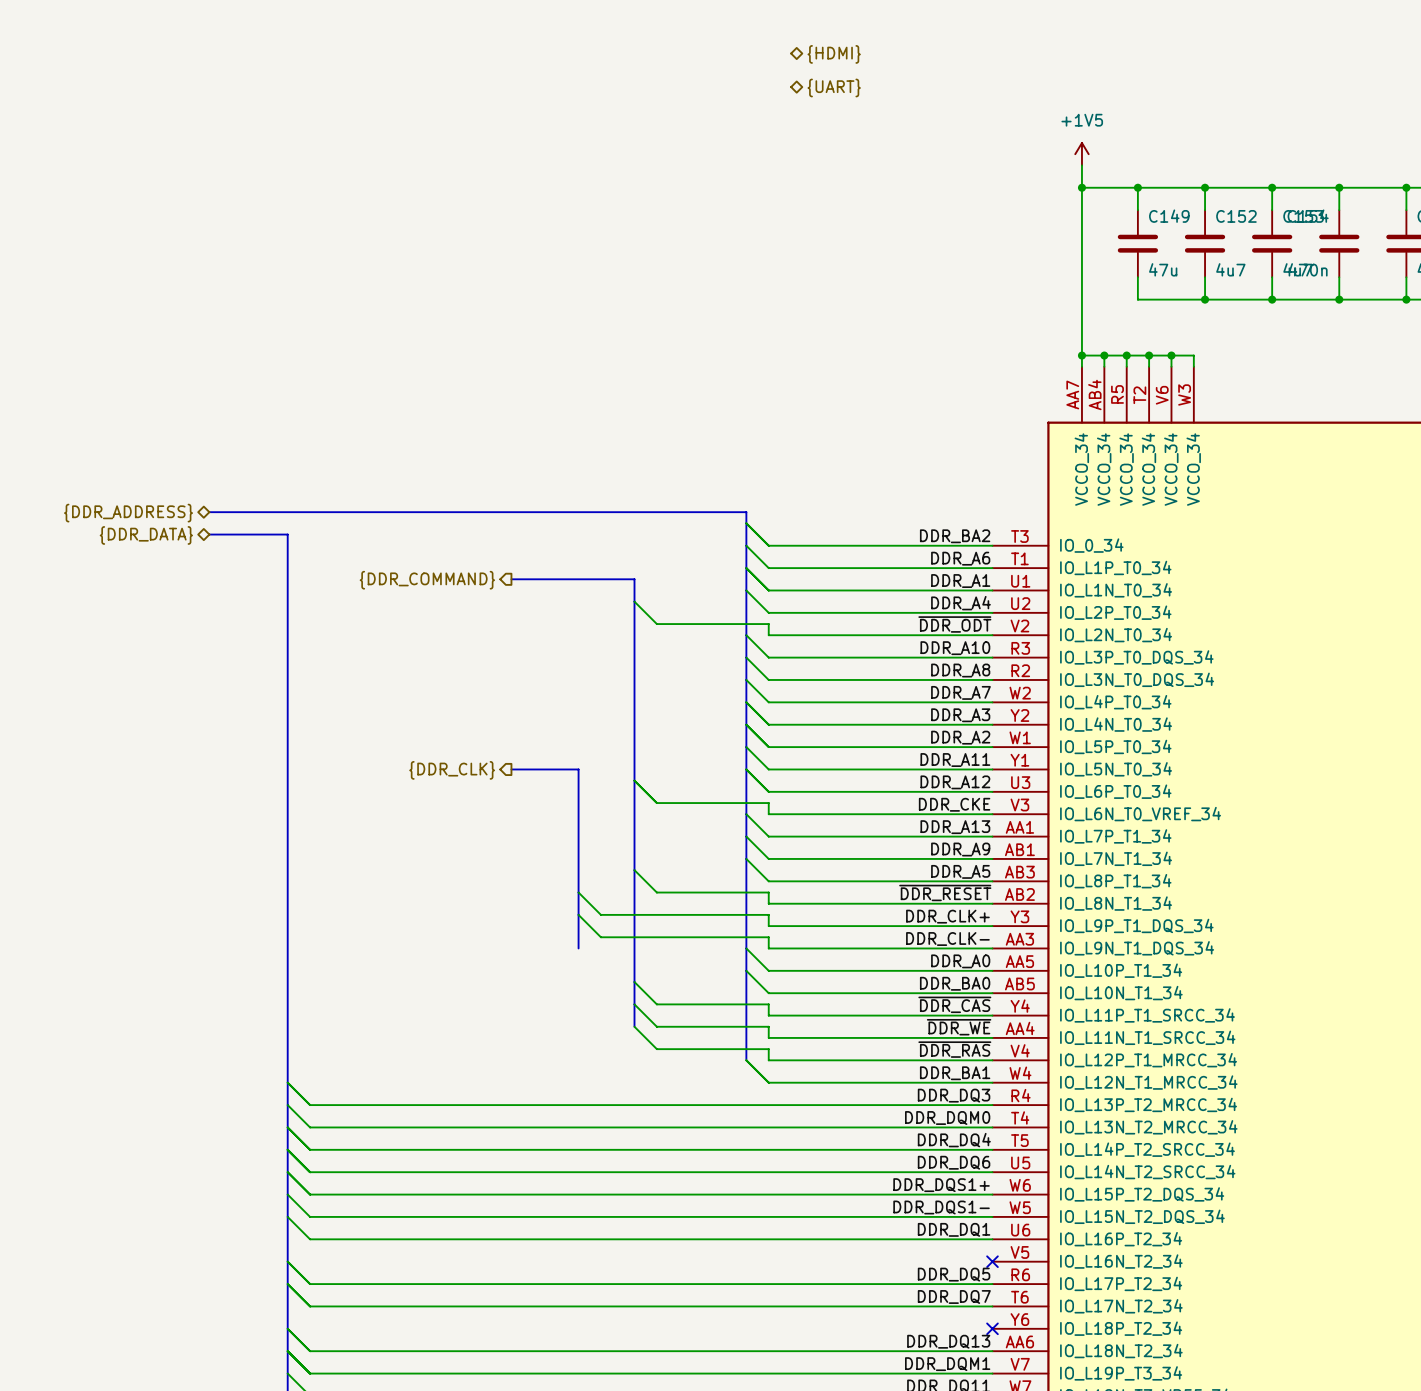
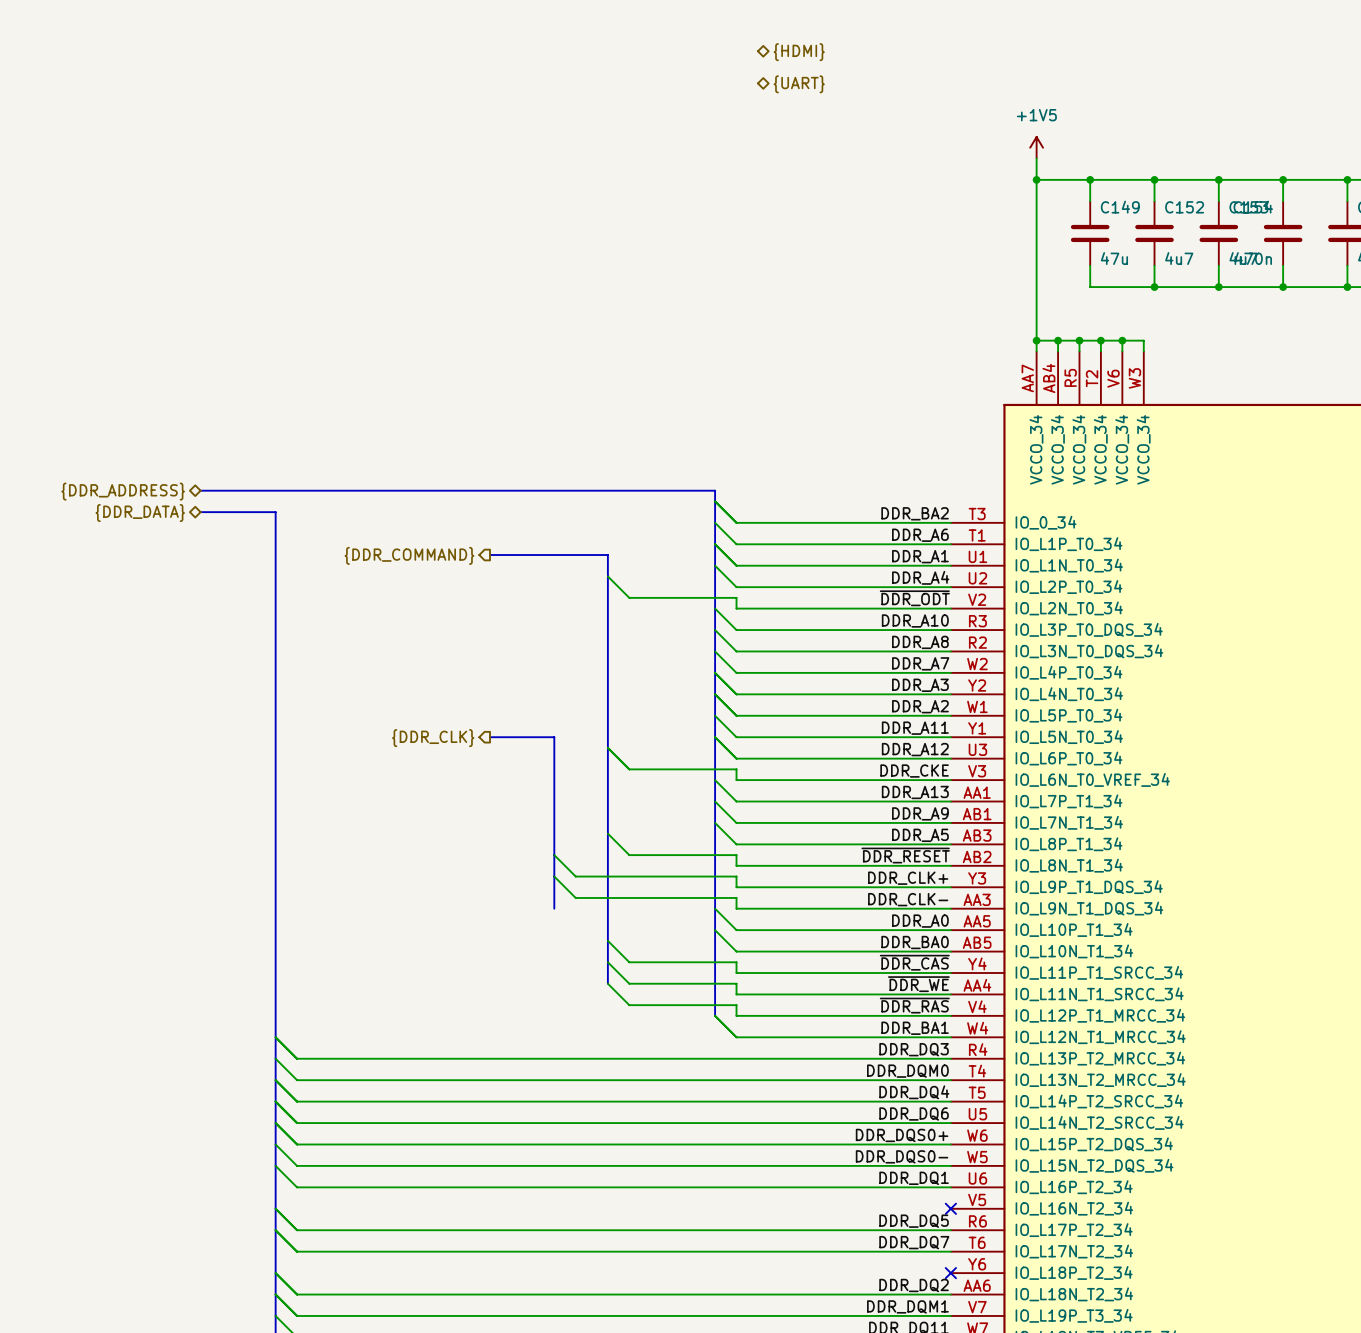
label: DDR_DQS1+ (941, 1185) -> DDR_DQS0+ (902, 1135)
label: DDR_DQS1- (941, 1207) -> DDR_DQS0- (902, 1156)
label: DDR_DQ13 (948, 1341) -> DDR_DQ2 (914, 1285)

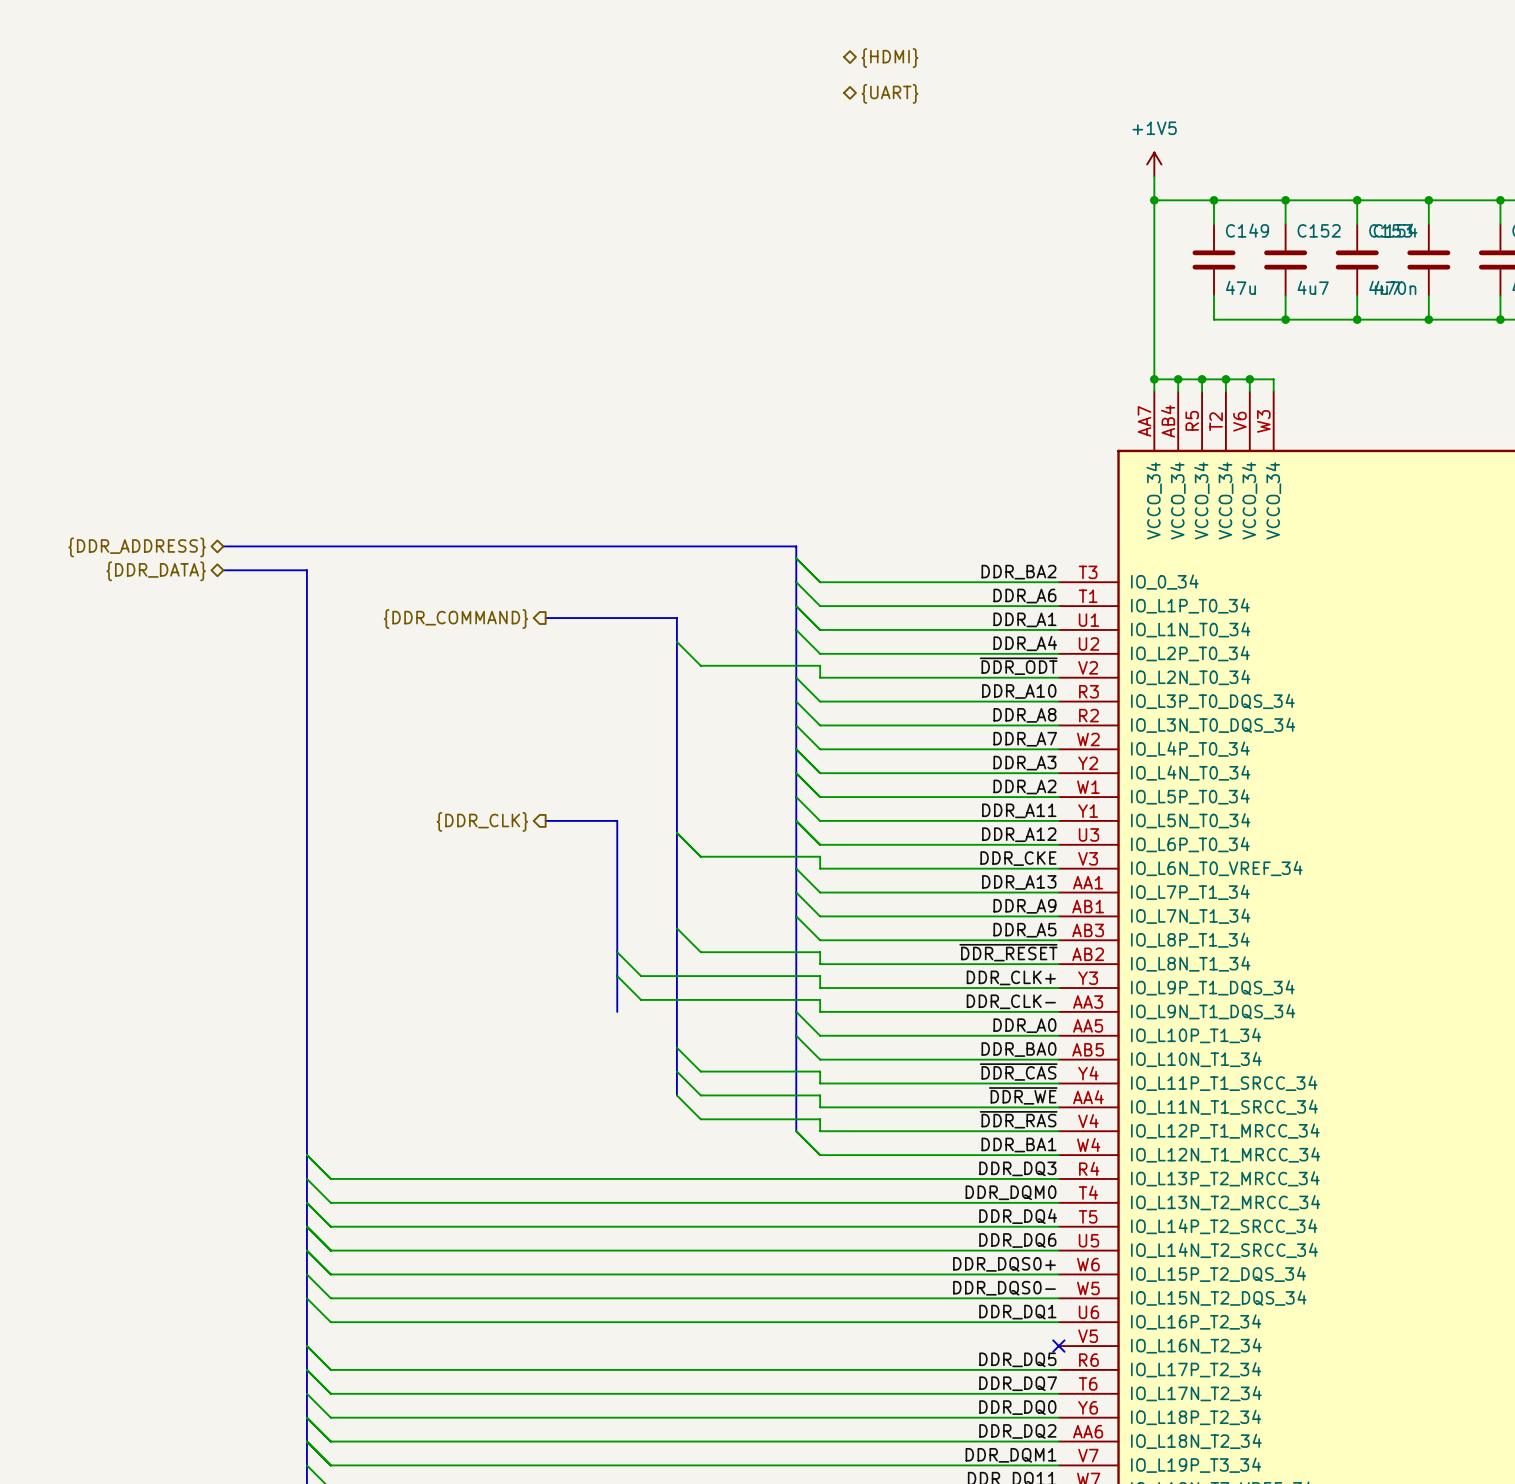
wire: none -> (306, 1393) (330, 1417) (1058, 1417)
label: none -> DDR_DQ0 (1017, 1407)
no-connect mark: (950, 1273) -> none

